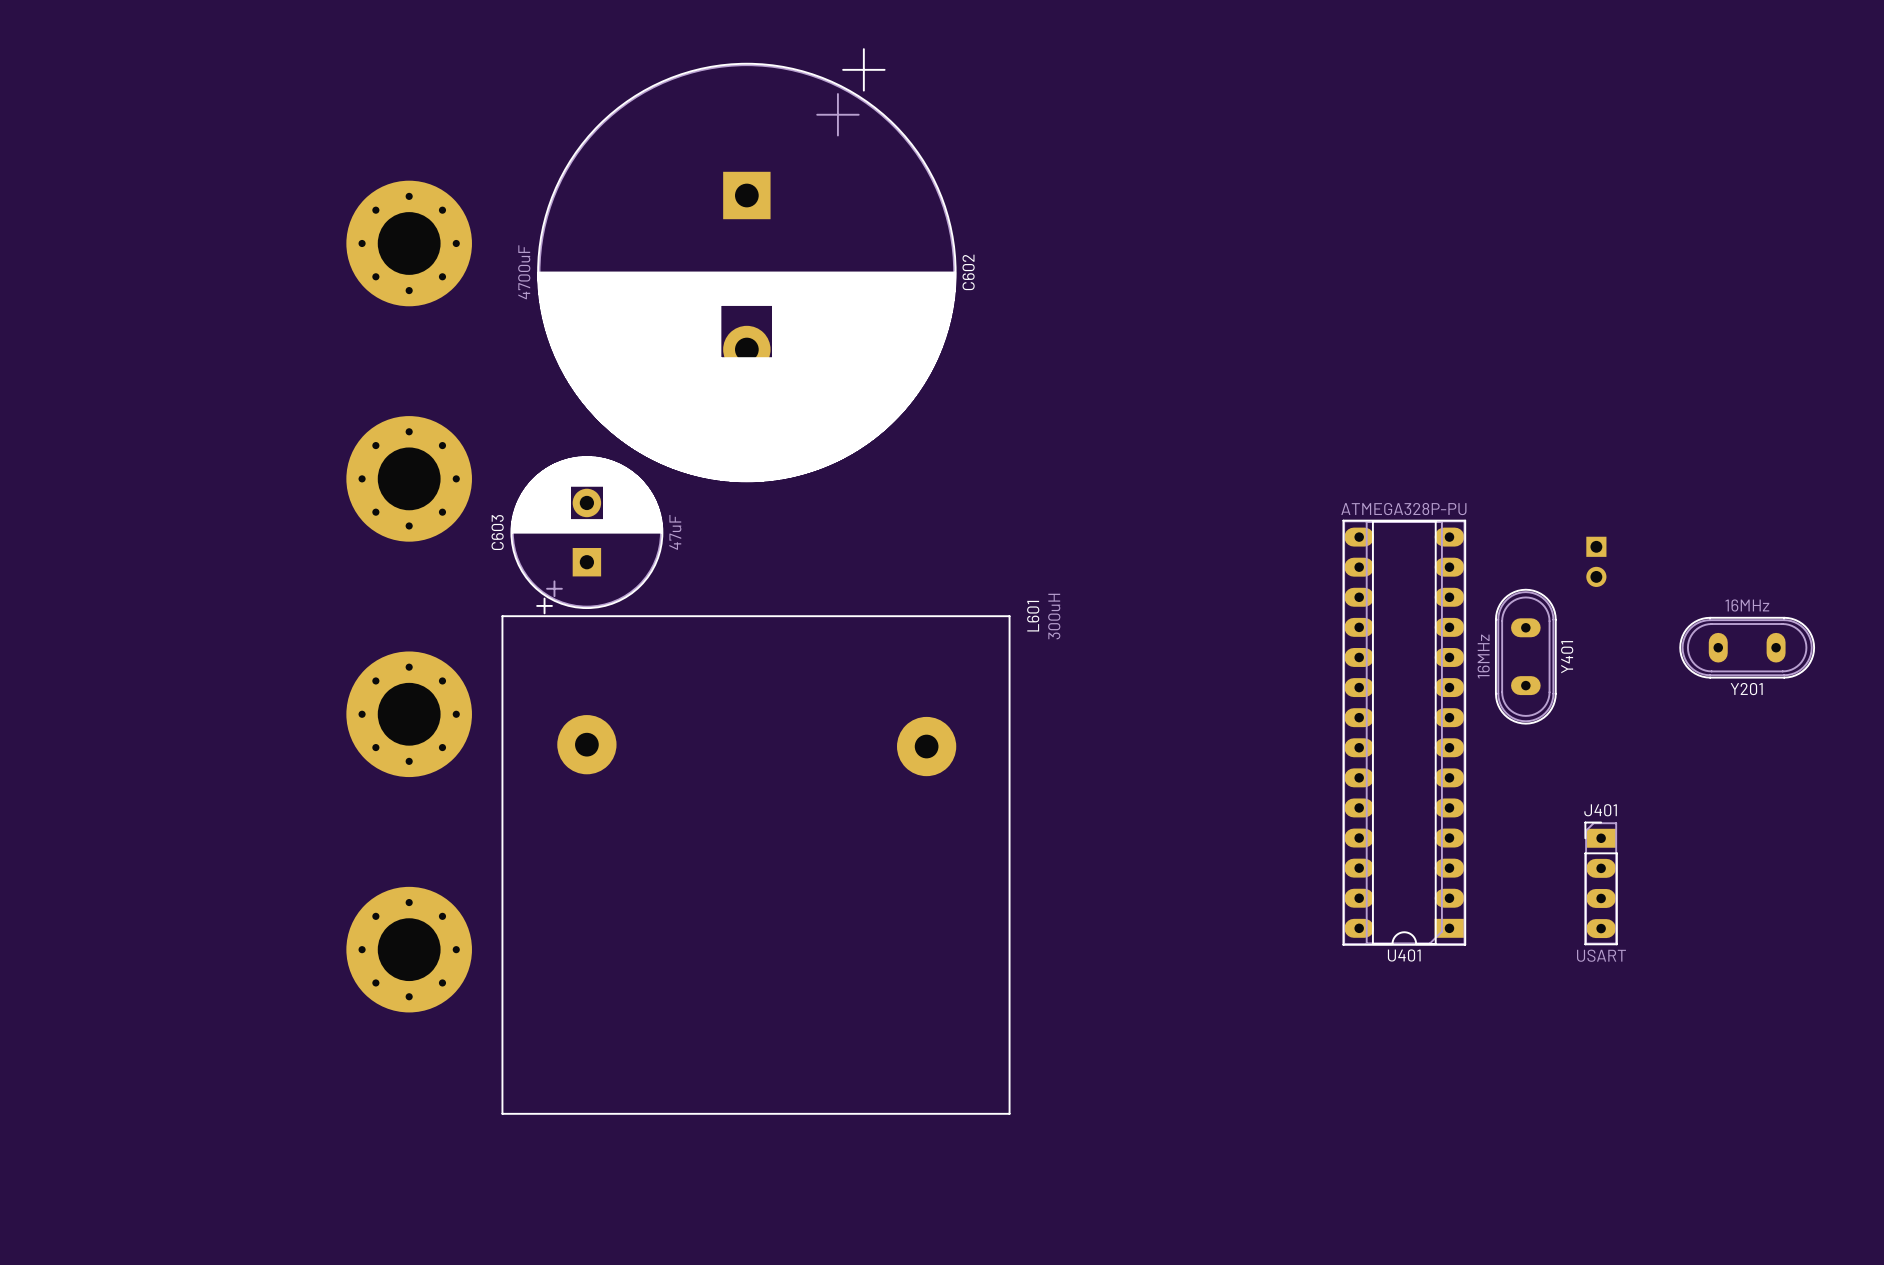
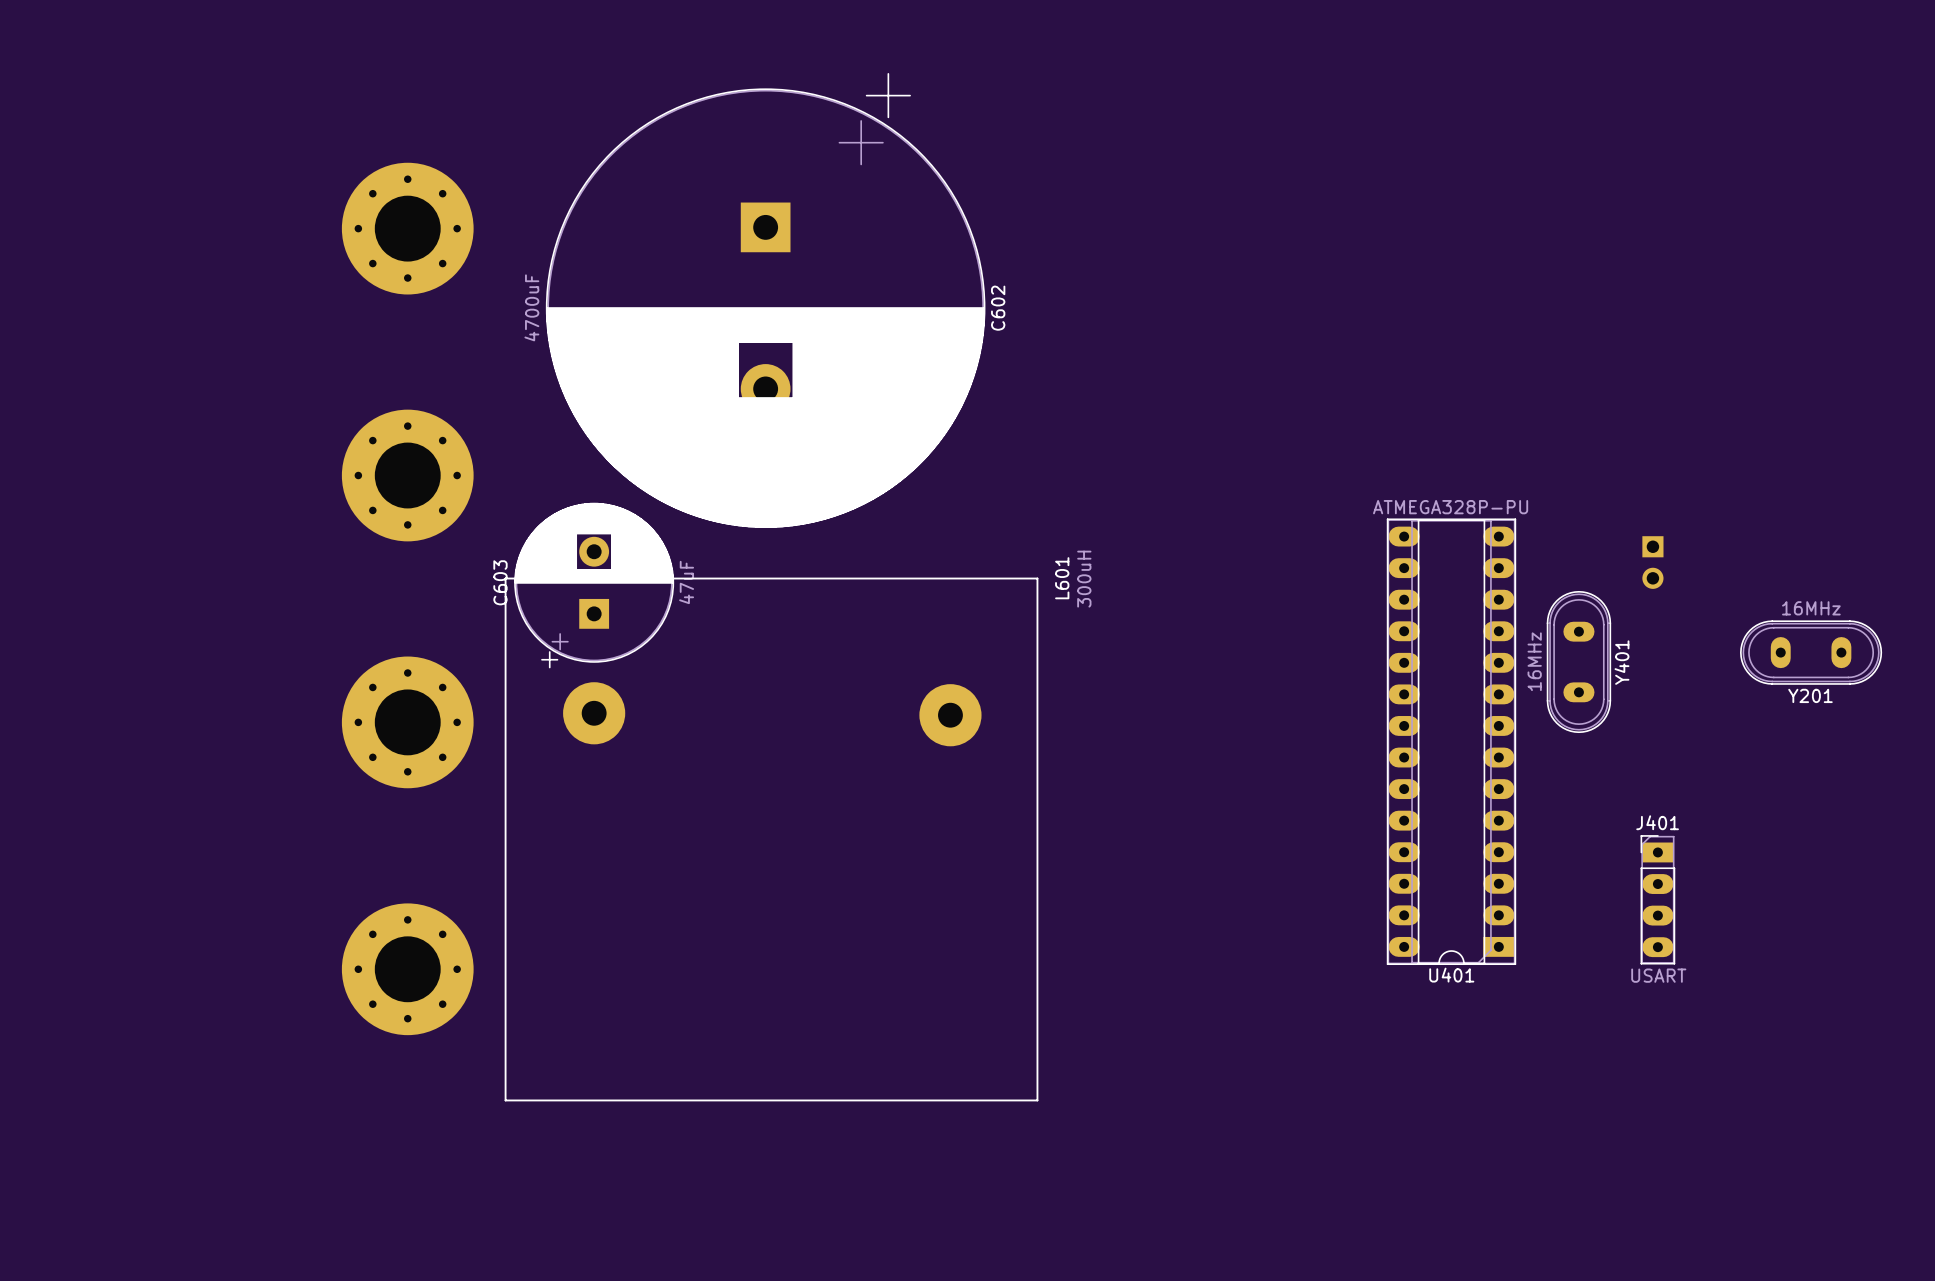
C602 position: (746, 265) -> (765, 300)
C603 position: (586, 535) -> (594, 585)
L601 position: (756, 865) -> (771, 839)

